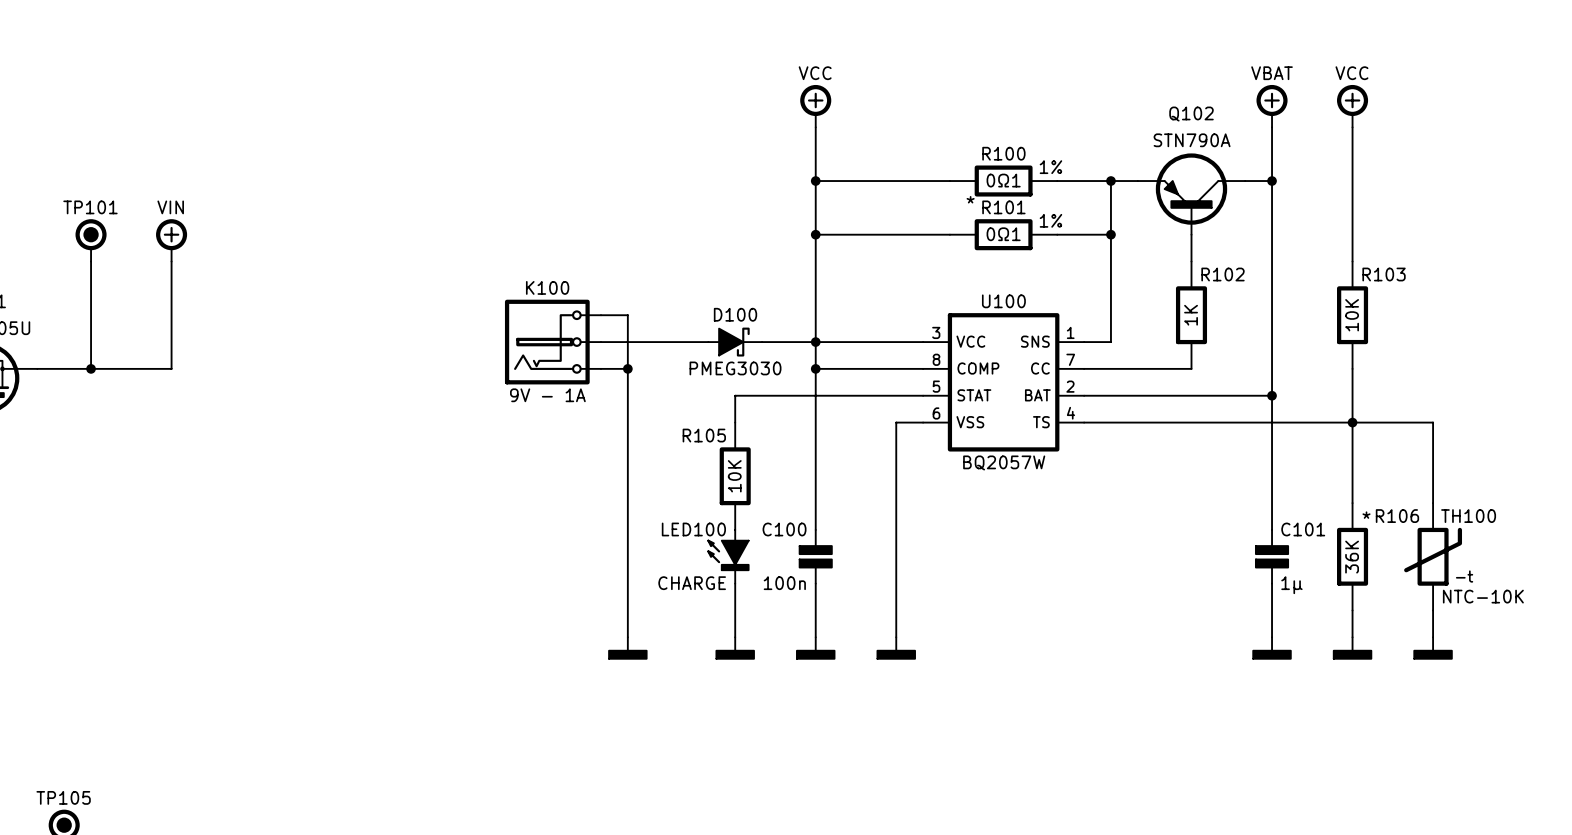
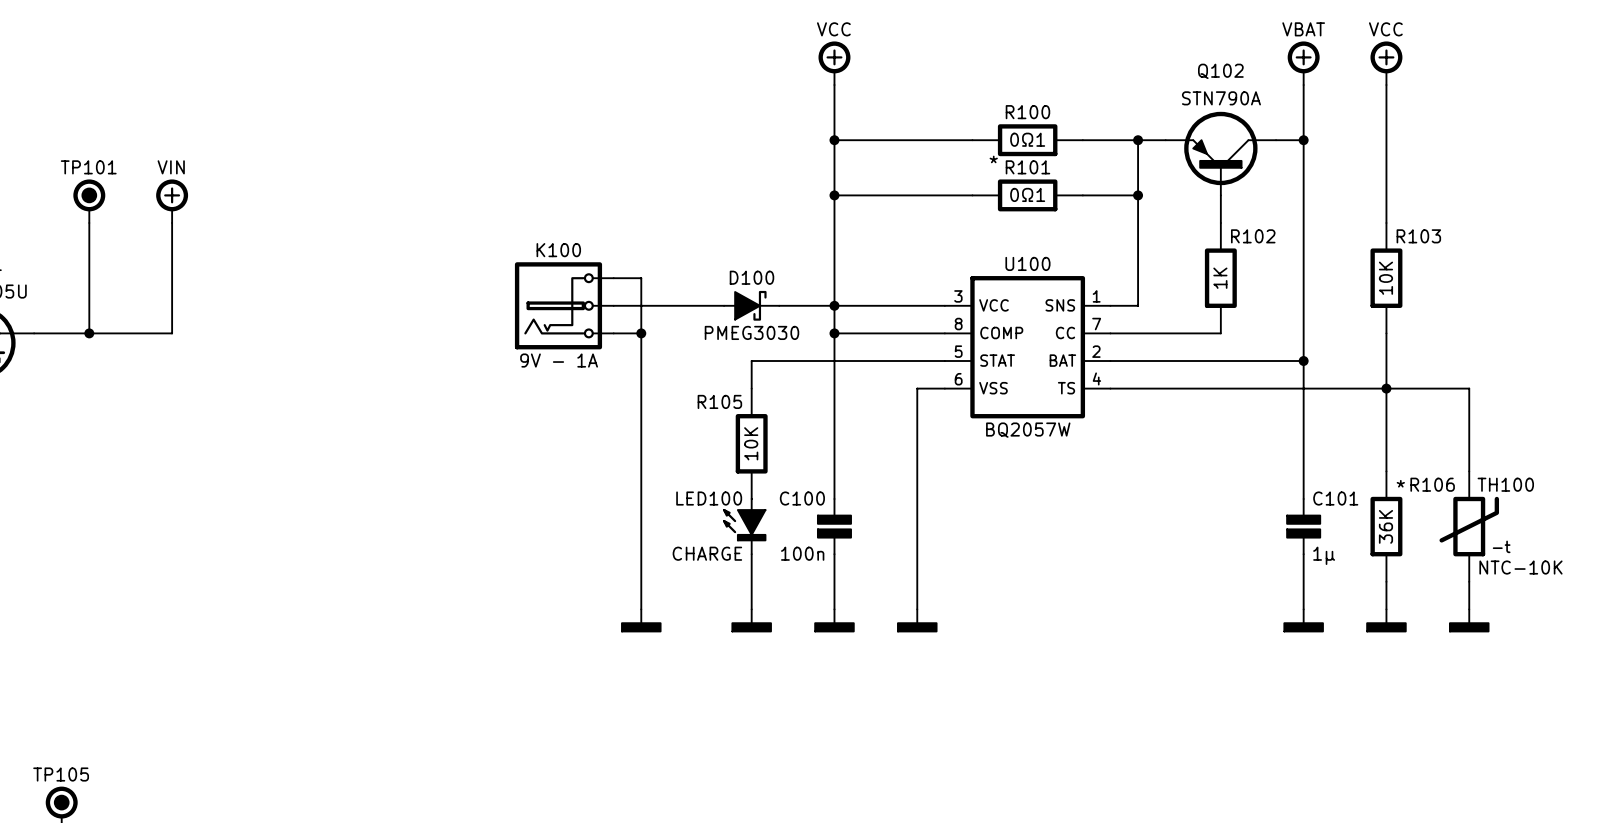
R100 text: 1% (1050, 167) -> none
R101 text: 1% (1050, 220) -> none

